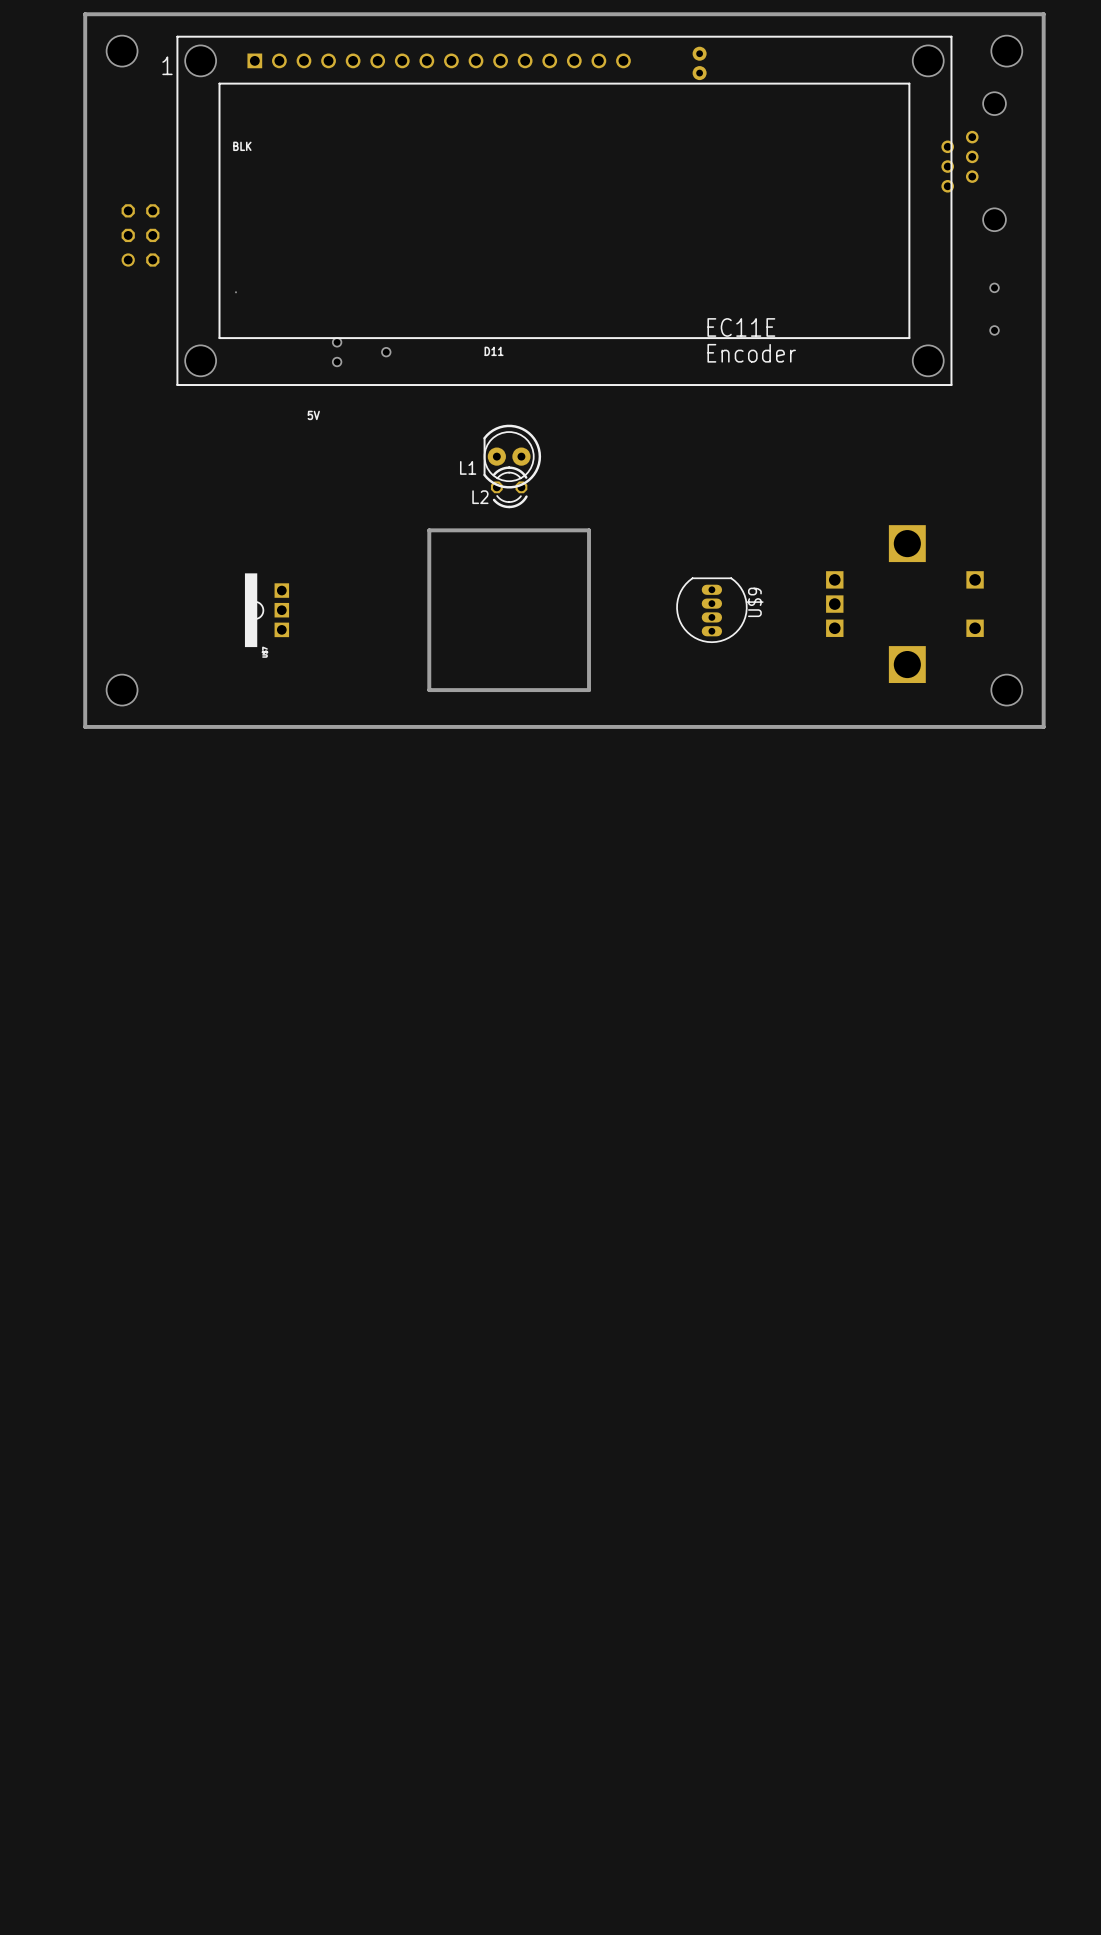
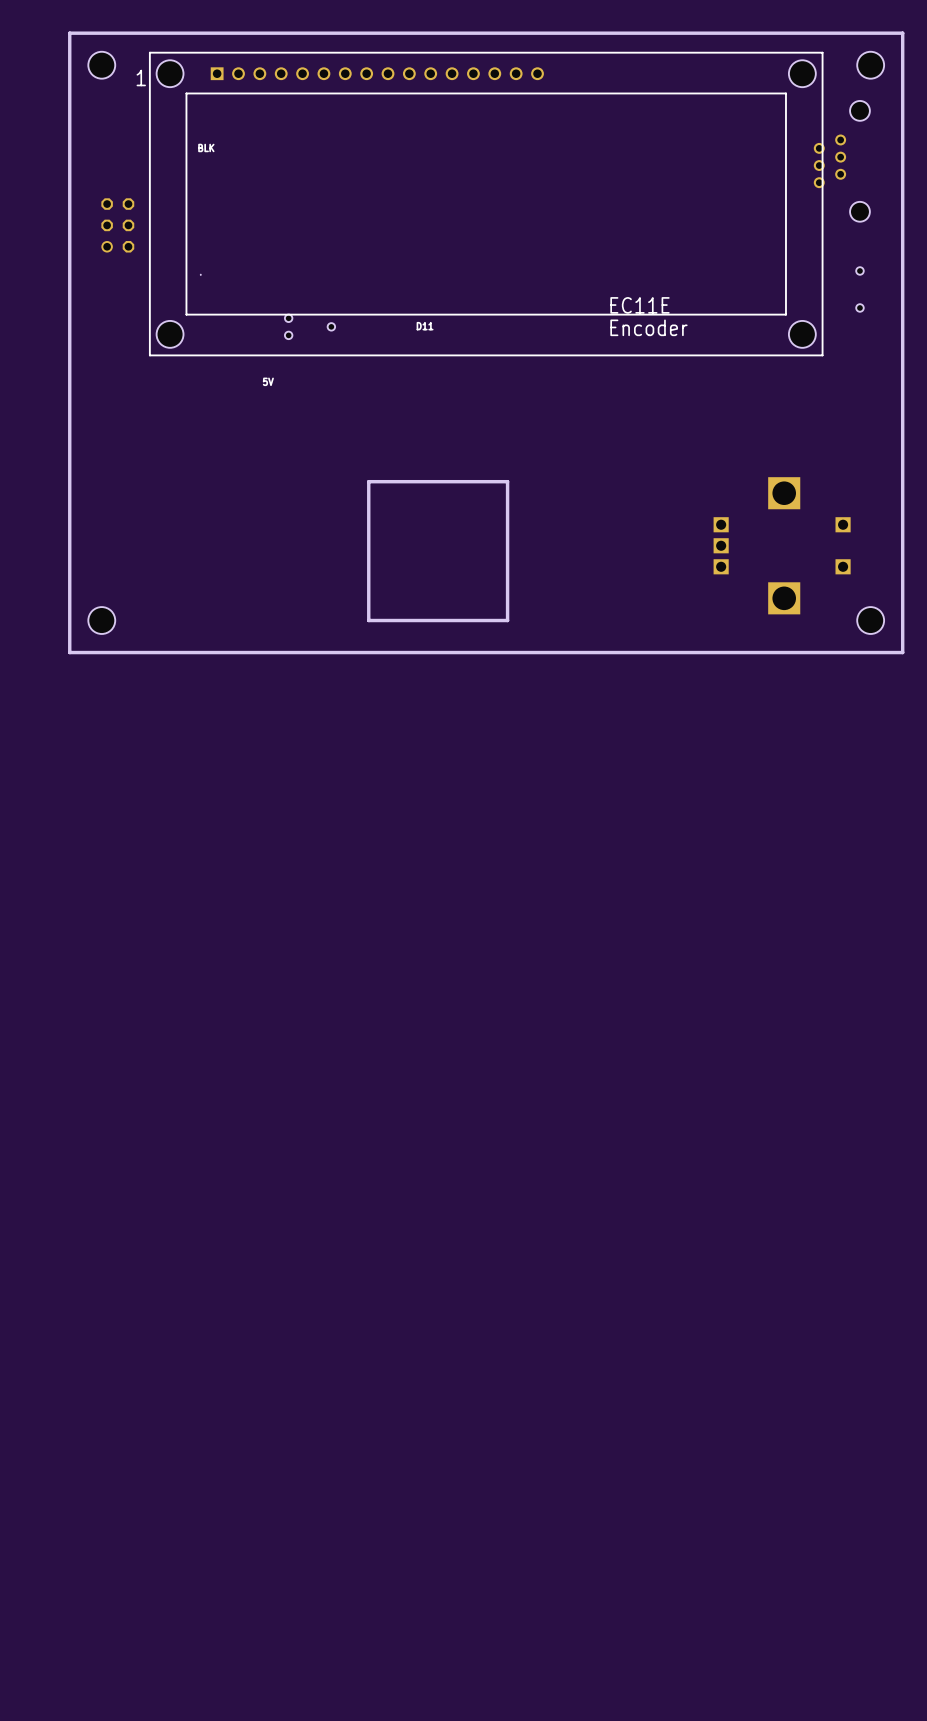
part: (699, 63) -> none
L1: (512, 456) -> none
L2: (509, 487) -> none
part: (267, 610) -> none
U$9: (711, 610) -> none

